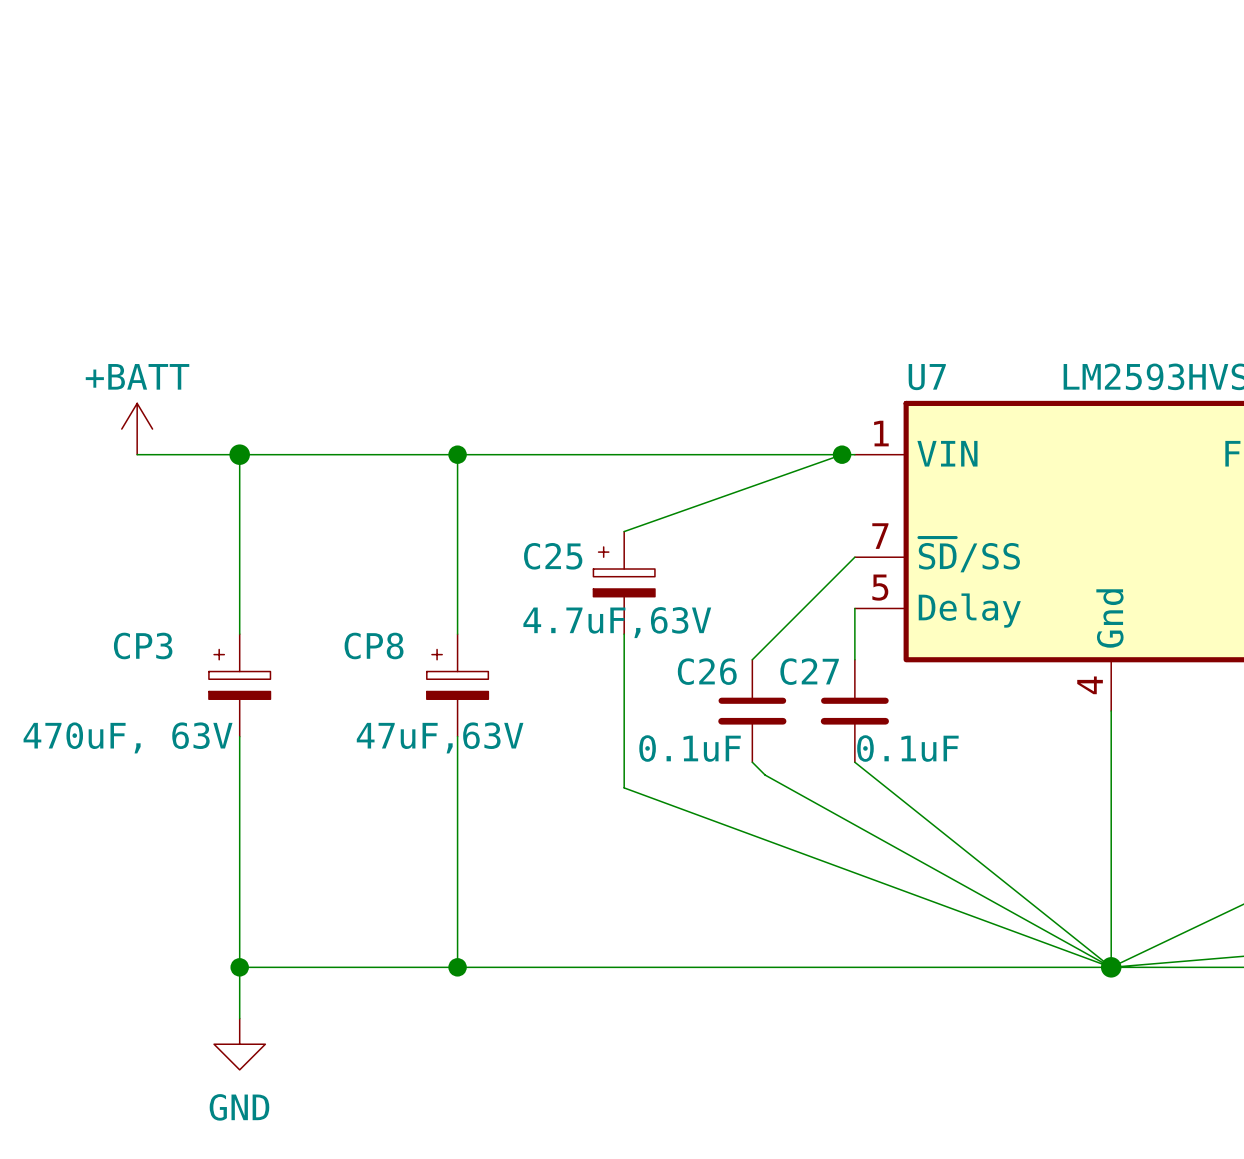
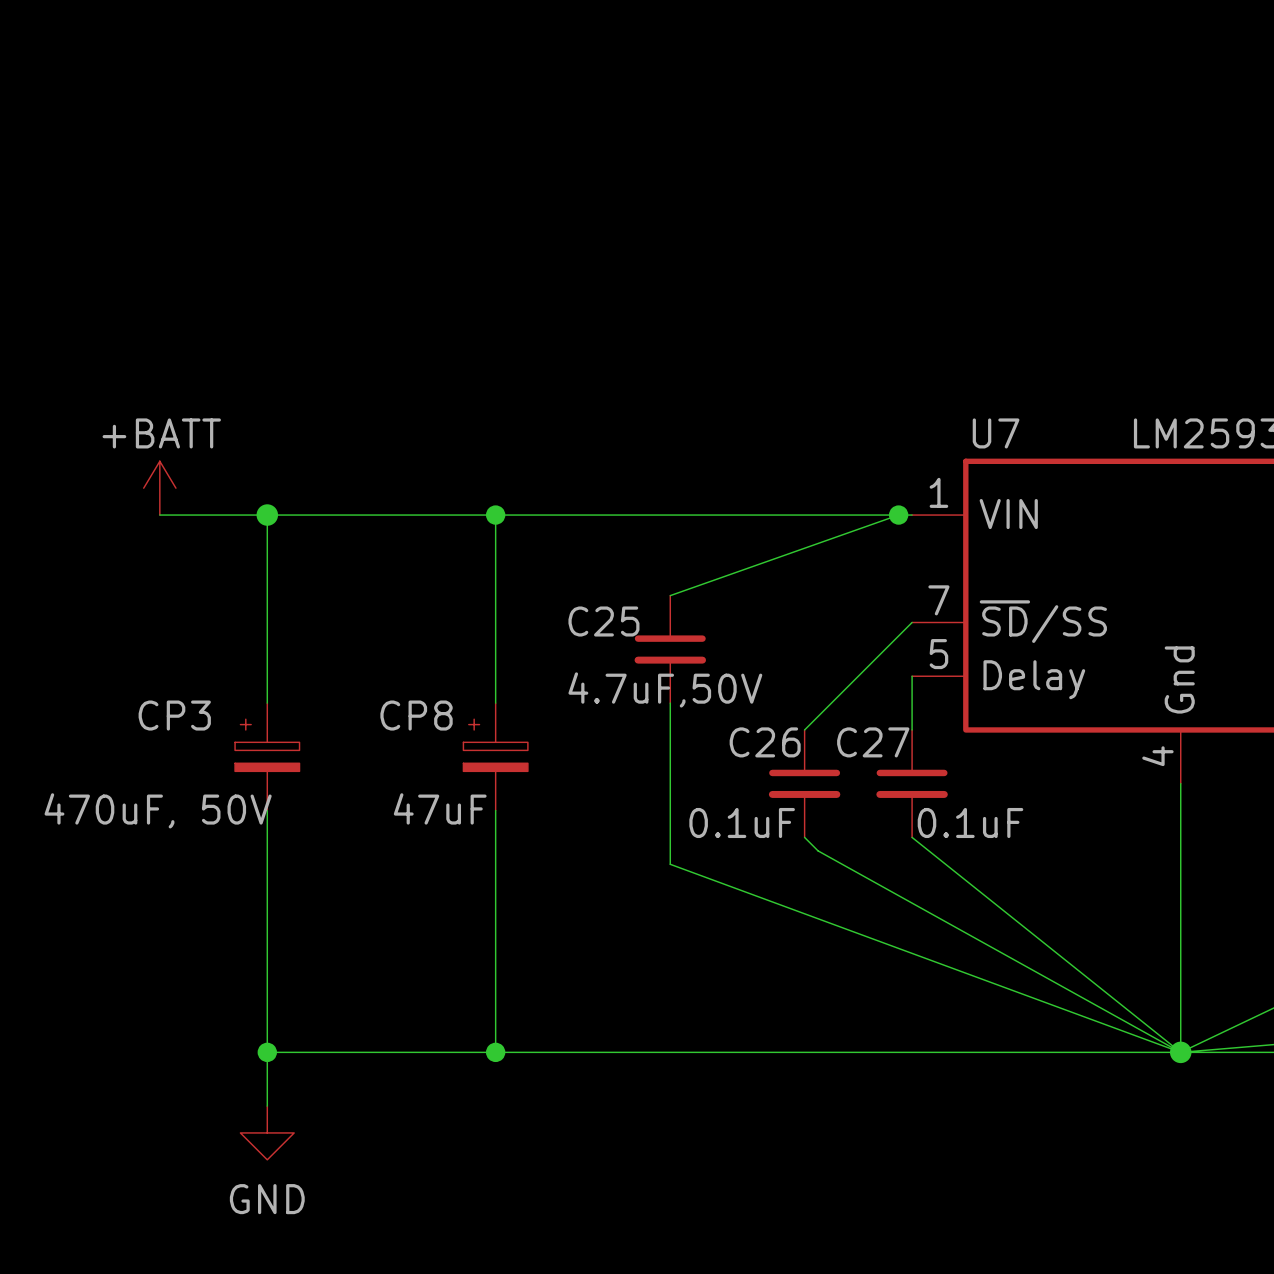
C25 symbol: [593, 531, 655, 635] -> [634, 595, 707, 704]
C25 value: 4.7uF,63V (617, 622) -> 4.7uF,50V (665, 689)
CP3 value: 470uF, 63V (128, 737) -> 470uF, 50V (158, 810)
CP8 value: 47uF,63V (440, 737) -> 47uF (440, 808)

